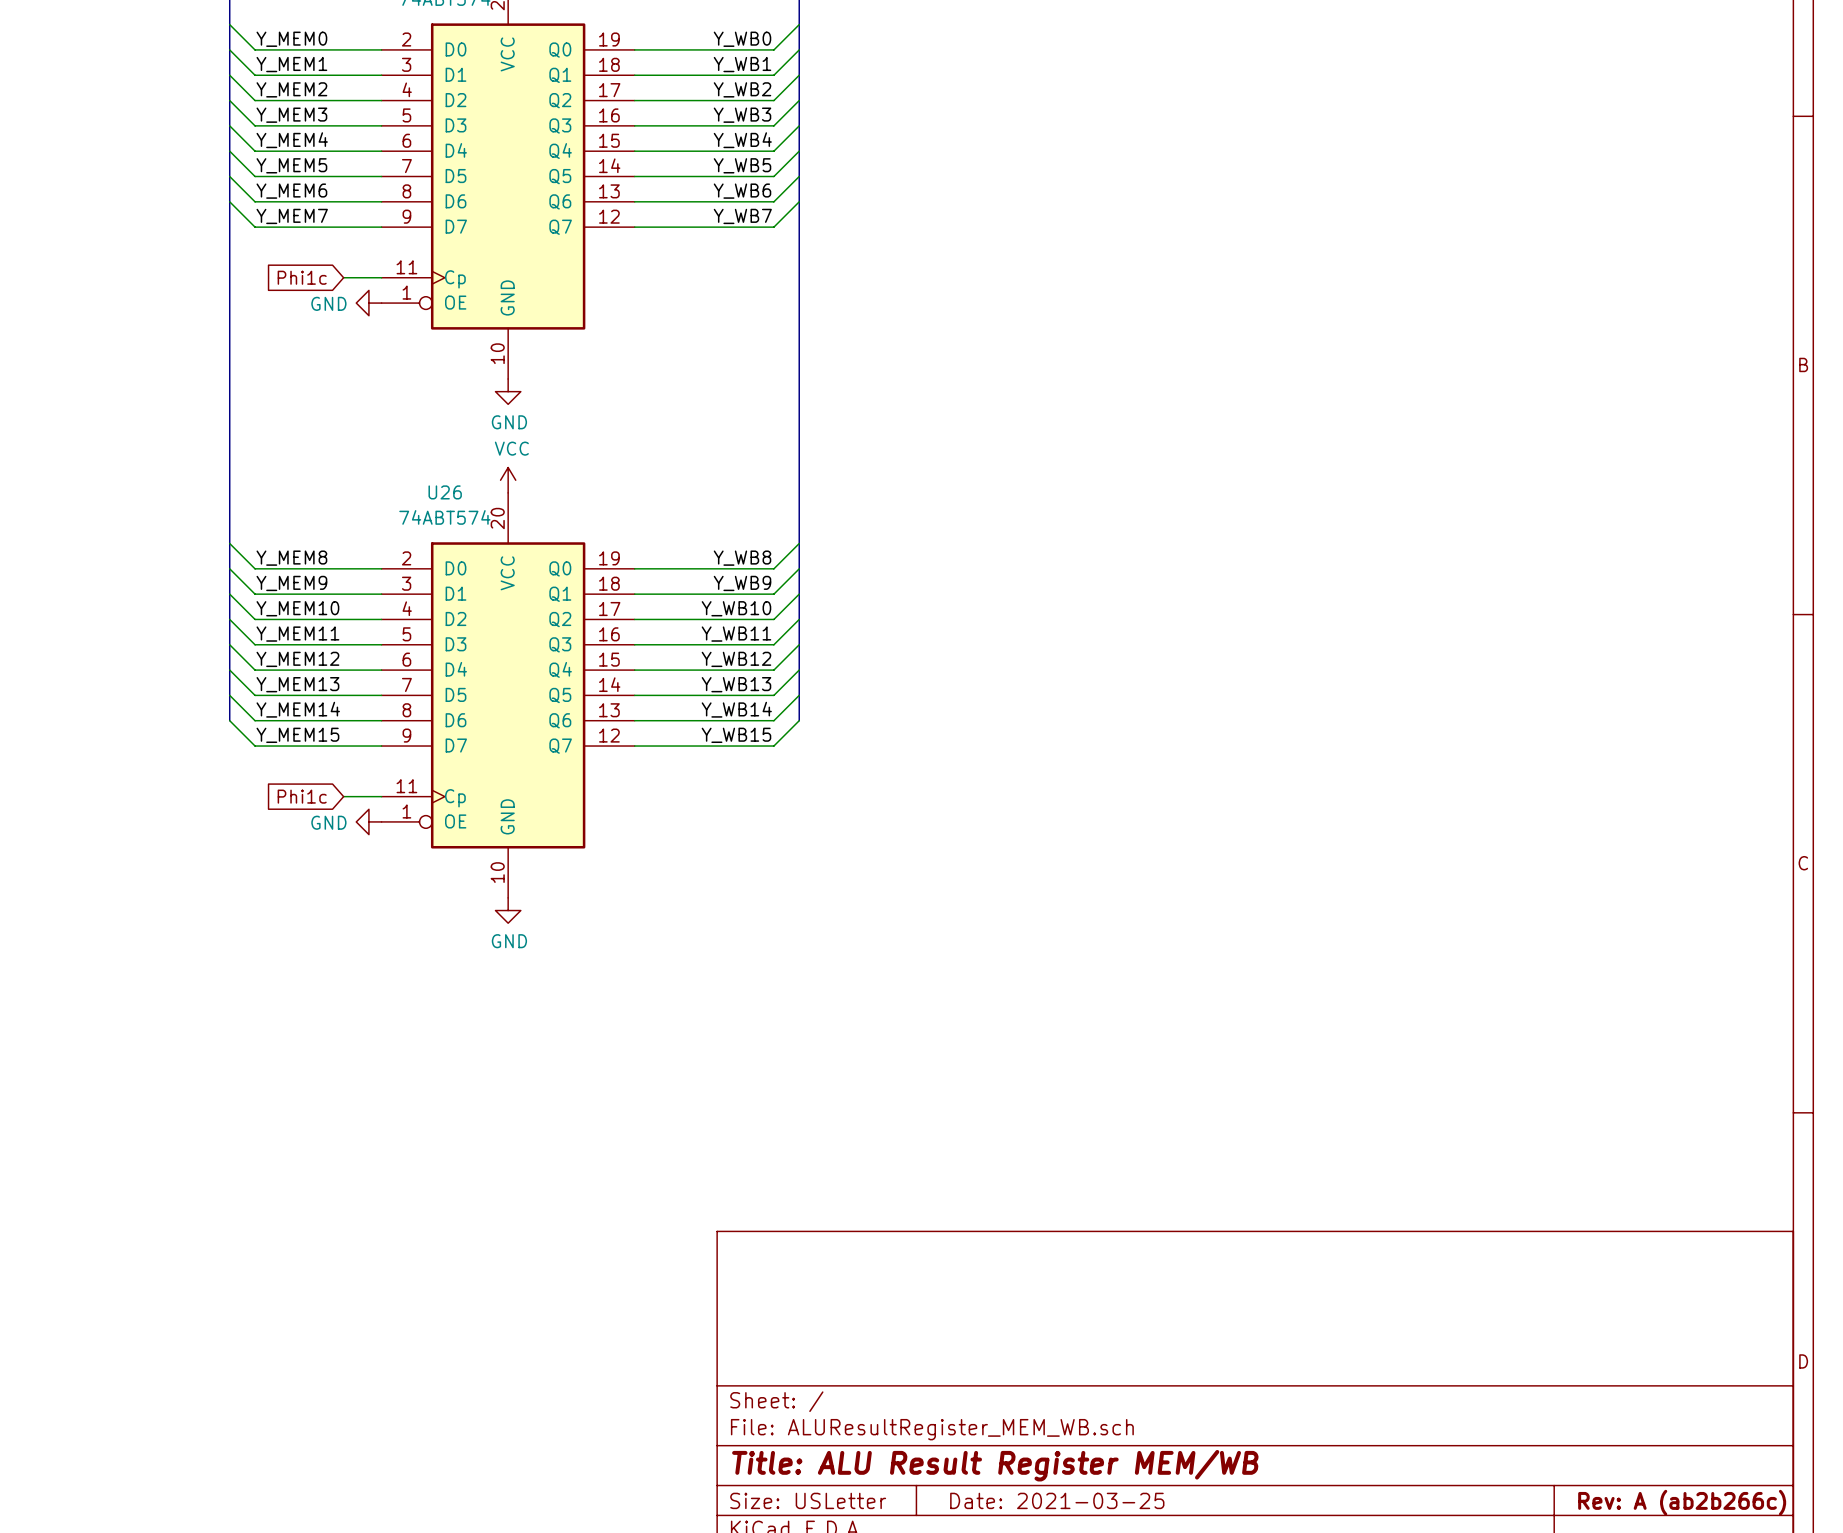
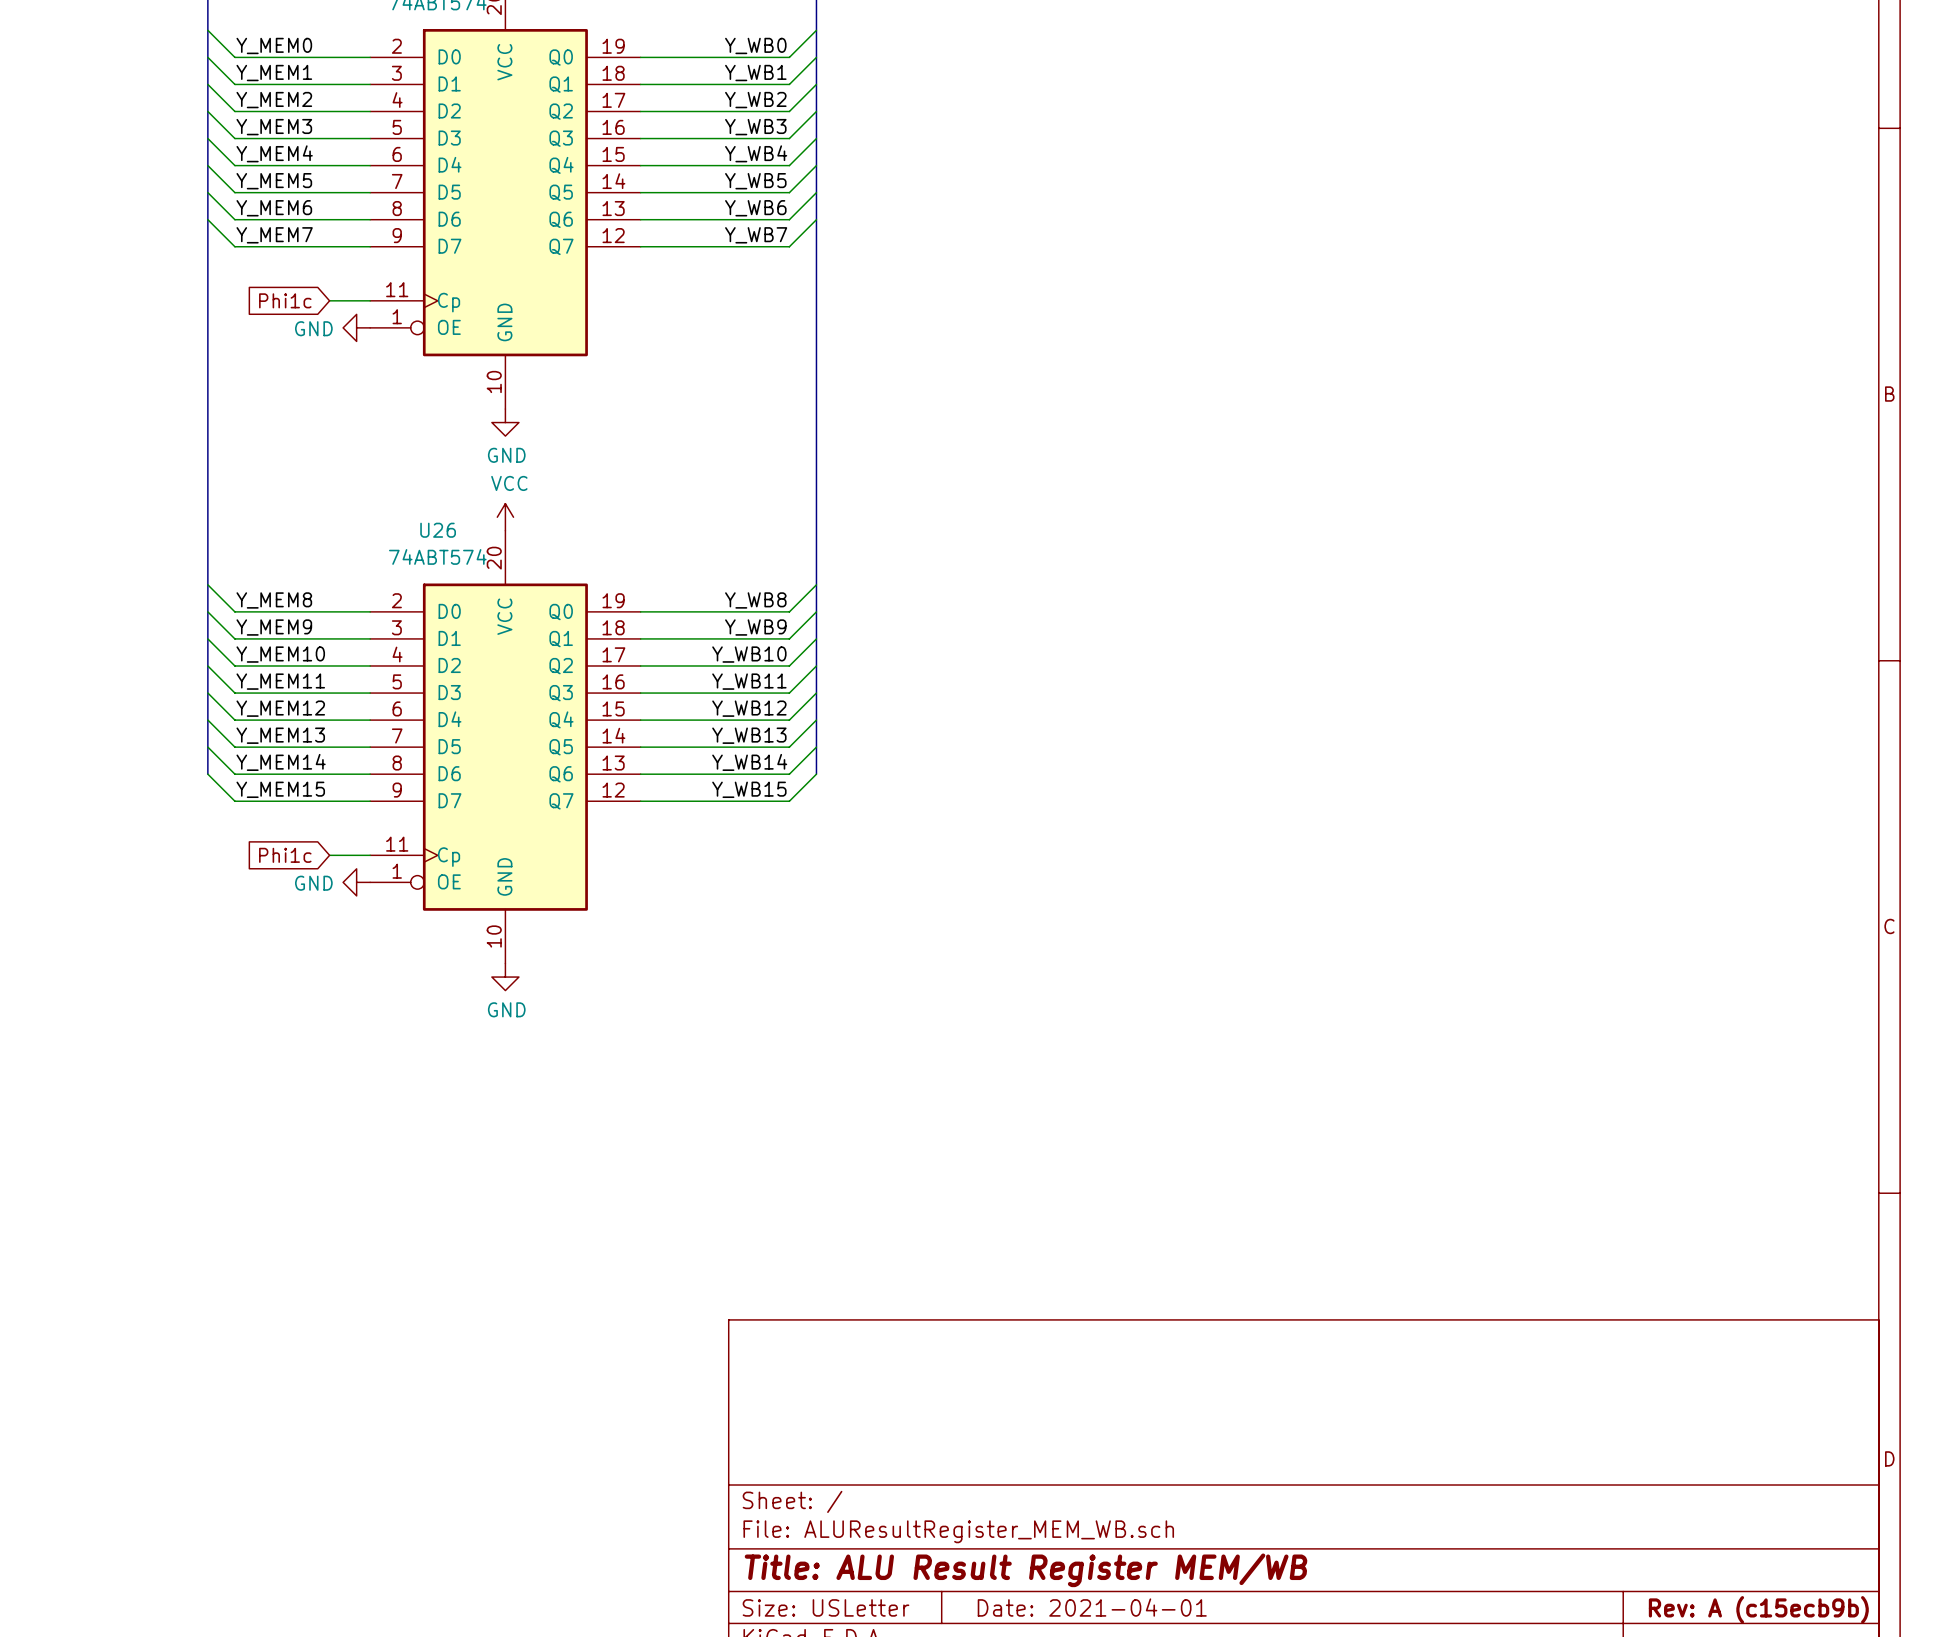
title block: Date: 2021-03-25 (1057, 1500) -> Date: 2021-04-01 (1092, 1607)
title block: Rev: A (ab2b266c) (1682, 1502) -> Rev: A (c15ecb9b) (1758, 1609)

